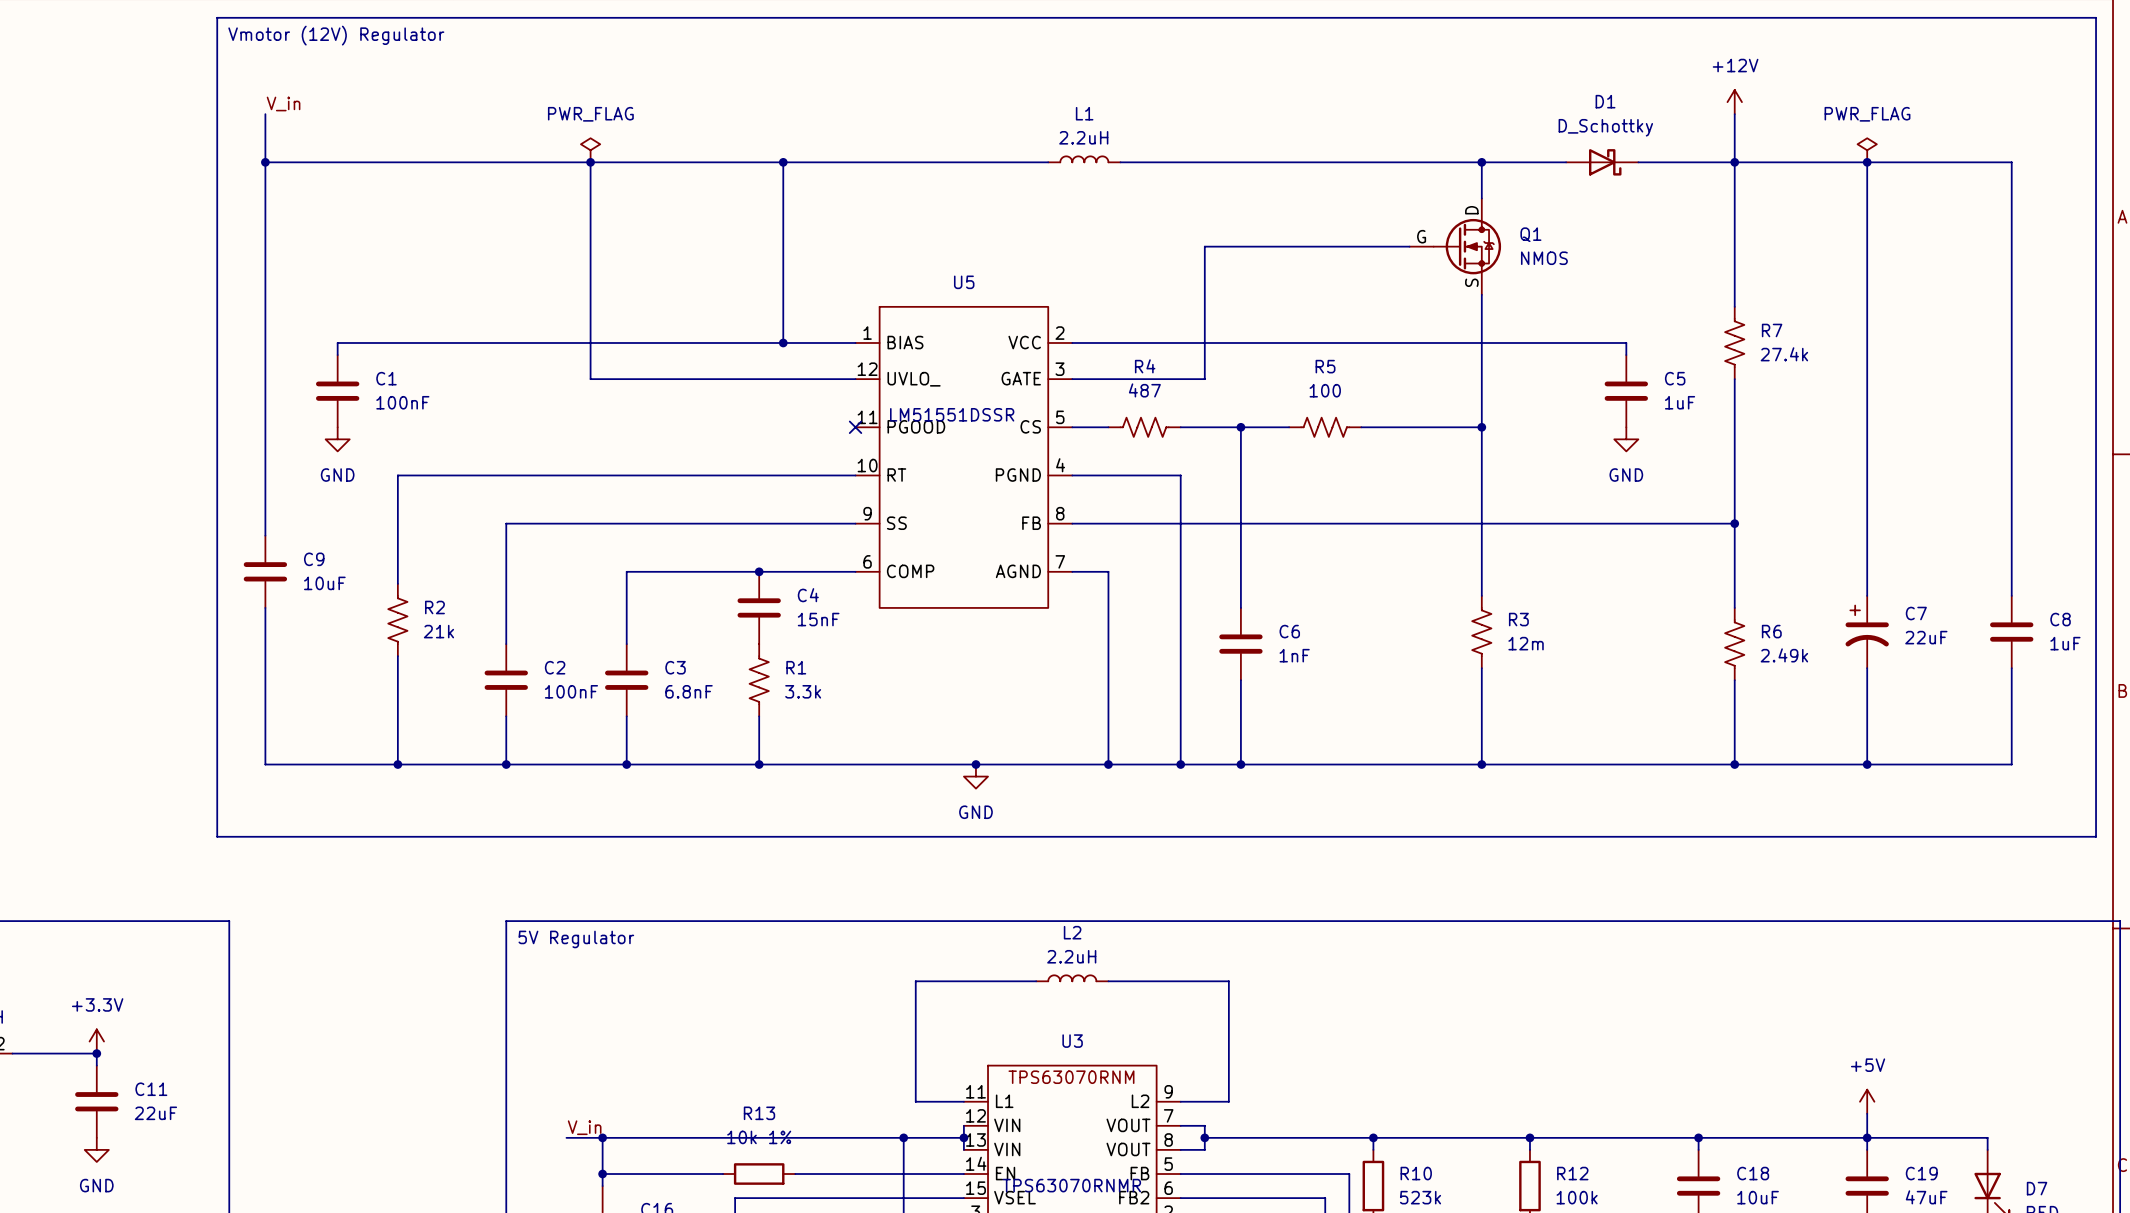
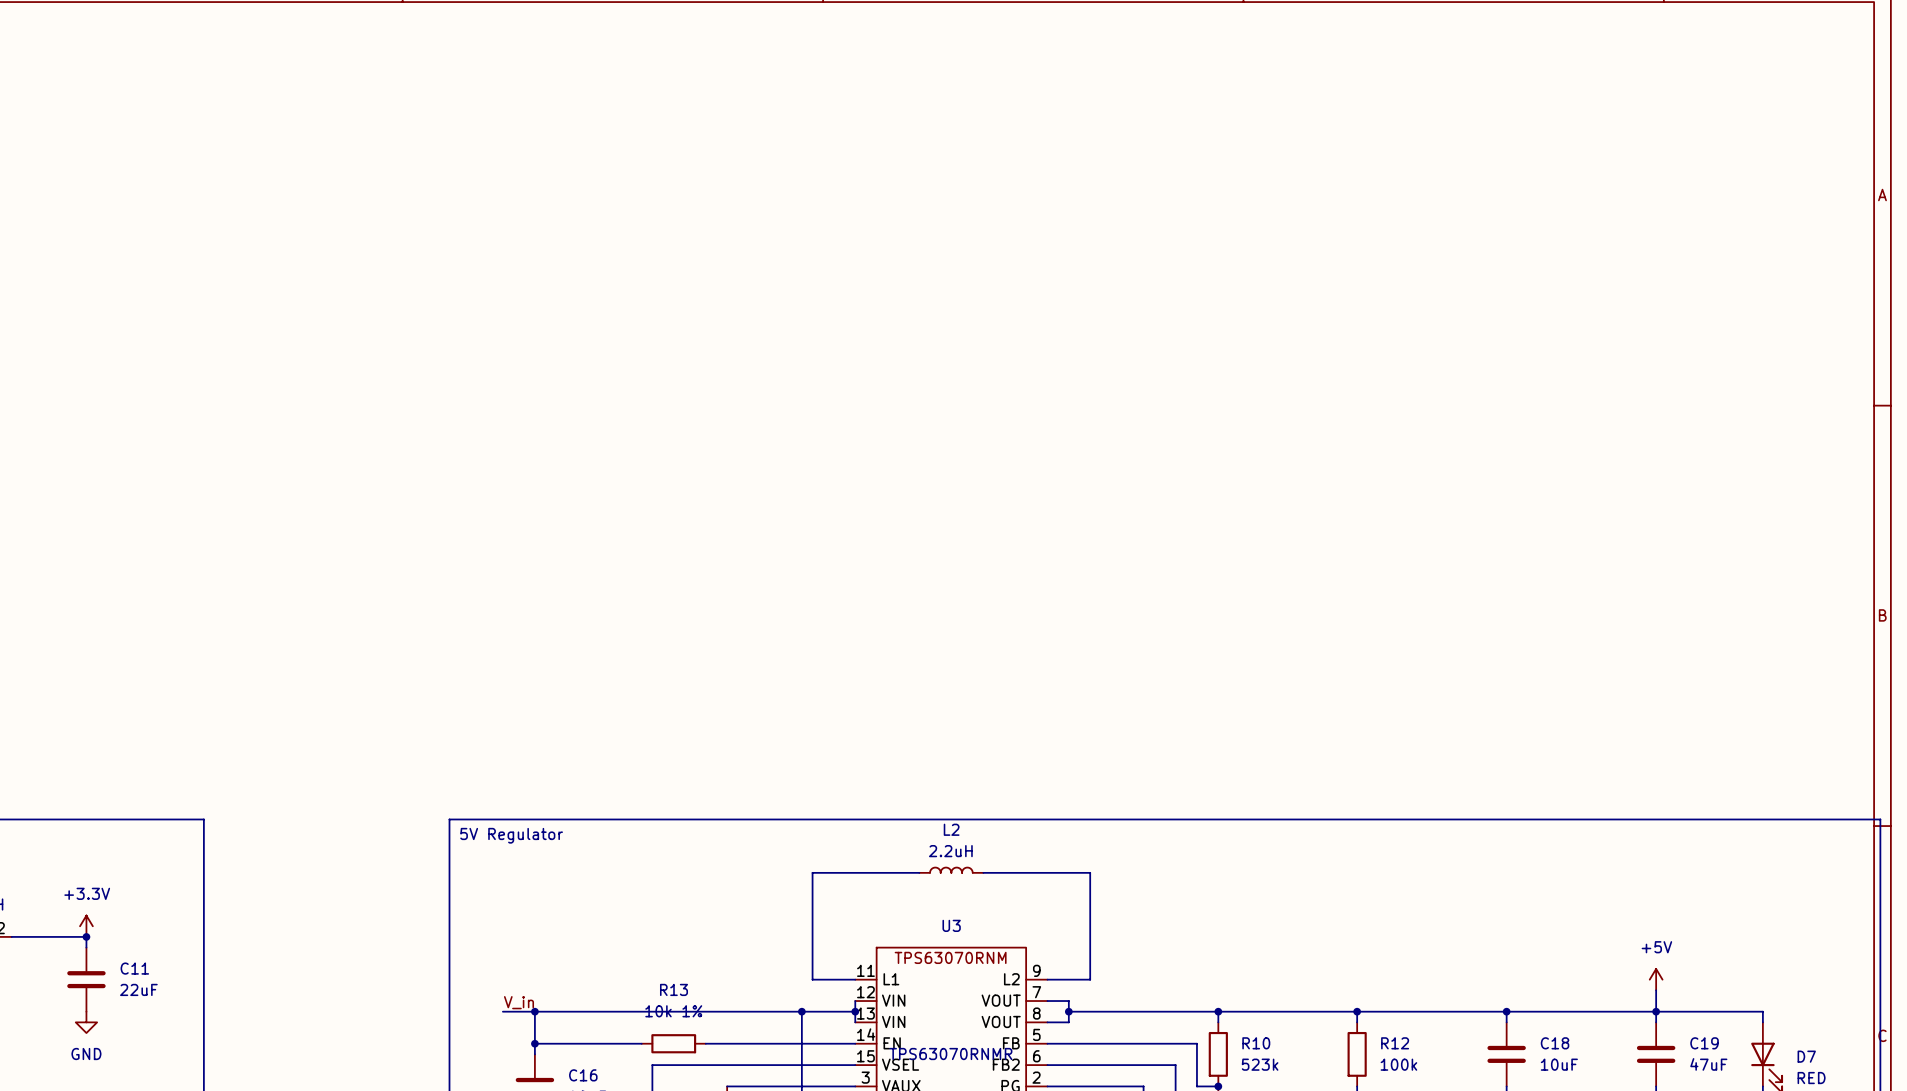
line: (217, 17) (2096, 17) (2096, 836) (217, 836) (217, 17) -> none
text: Vmotor (12V) Regulator (336, 35) -> none
power symbol: +12V (1734, 102) -> none
label: V_in (283, 103) -> none
wire: (265, 114) (265, 535) -> none
wire: (1734, 114) (1734, 306) -> none
power symbol: PWR_FLAG (590, 150) -> none
power symbol: PWR_FLAG (1867, 150) -> none
L1: 2.2uH (1084, 159) -> none
wire: (265, 162) (1048, 162) -> none
junction: (265, 162) -> none
wire: (590, 162) (590, 379) (855, 379) -> none
junction: (590, 162) -> none
wire: (783, 162) (783, 342) -> none
junction: (783, 162) -> none
wire: (1120, 162) (1566, 162) -> none
wire: (1481, 162) (1481, 198) -> none
junction: (1481, 162) -> none
D1: D_Schottky (1602, 162) -> none
wire: (1638, 162) (2011, 162) (2011, 595) -> none
junction: (1734, 162) -> none
wire: (1867, 162) (1867, 595) -> none
junction: (1867, 162) -> none
wire: (1409, 246) (1204, 246) (1204, 379) (1072, 379) -> none
Q1: NMOS (1455, 246) -> none
wire: (1481, 294) (1481, 595) -> none
junction: (783, 342) -> none
wire: (855, 342) (337, 342) (337, 355) -> none
wire: (1072, 342) (1626, 342) (1626, 355) -> none
R7: 27.4k (1734, 342) -> none
wire: (1734, 379) (1734, 607) -> none
C1: 100nF (337, 391) -> none
C5: 1uF (1626, 391) -> none
no-connect mark: (855, 427) -> none
wire: (1072, 427) (1108, 427) -> none
R4: 487 (1144, 427) -> none
wire: (1180, 427) (1289, 427) -> none
wire: (1240, 427) (1240, 607) -> none
junction: (1240, 427) -> none
R5: 100 (1325, 427) -> none
wire: (1361, 427) (1481, 427) -> none
junction: (1481, 427) -> none
power symbol: GND (337, 439) -> none
power symbol: GND (1626, 439) -> none
U5: LM51551DSSR (963, 457) -> none
wire: (855, 475) (397, 475) (397, 583) -> none
wire: (1072, 475) (1180, 475) (1180, 764) -> none
wire: (855, 523) (506, 523) (506, 644) -> none
wire: (1072, 523) (1734, 523) -> none
junction: (1734, 523) -> none
C9: 10uF (265, 571) -> none
junction: (759, 571) -> none
wire: (855, 571) (626, 571) (626, 644) -> none
wire: (1072, 571) (1108, 571) (1108, 764) -> none
wire: (265, 607) (265, 764) (2011, 764) (2011, 668) -> none
C4: 15nF (759, 607) -> none
R2: 21k (397, 619) -> none
R3: 12m (1481, 632) -> none
C7: 22uF (1867, 632) -> none
C8: 1uF (2011, 632) -> none
C6: 1nF (1240, 644) -> none
R6: 2.49k (1734, 644) -> none
wire: (397, 656) (397, 764) -> none
wire: (1481, 668) (1481, 764) -> none
wire: (1867, 668) (1867, 764) -> none
C2: 100nF (506, 680) -> none
C3: 6.8nF (626, 680) -> none
R1: 3.3k (759, 680) -> none
wire: (1240, 680) (1240, 764) -> none
wire: (1734, 680) (1734, 764) -> none
wire: (506, 716) (506, 764) -> none
wire: (626, 716) (626, 764) -> none
wire: (759, 716) (759, 764) -> none
junction: (397, 764) -> none
junction: (506, 764) -> none
junction: (626, 764) -> none
junction: (759, 764) -> none
junction: (975, 764) -> none
junction: (1108, 764) -> none
junction: (1180, 764) -> none
junction: (1240, 764) -> none
junction: (1481, 764) -> none
junction: (1734, 764) -> none
junction: (1867, 764) -> none
power symbol: GND (975, 776) -> none

